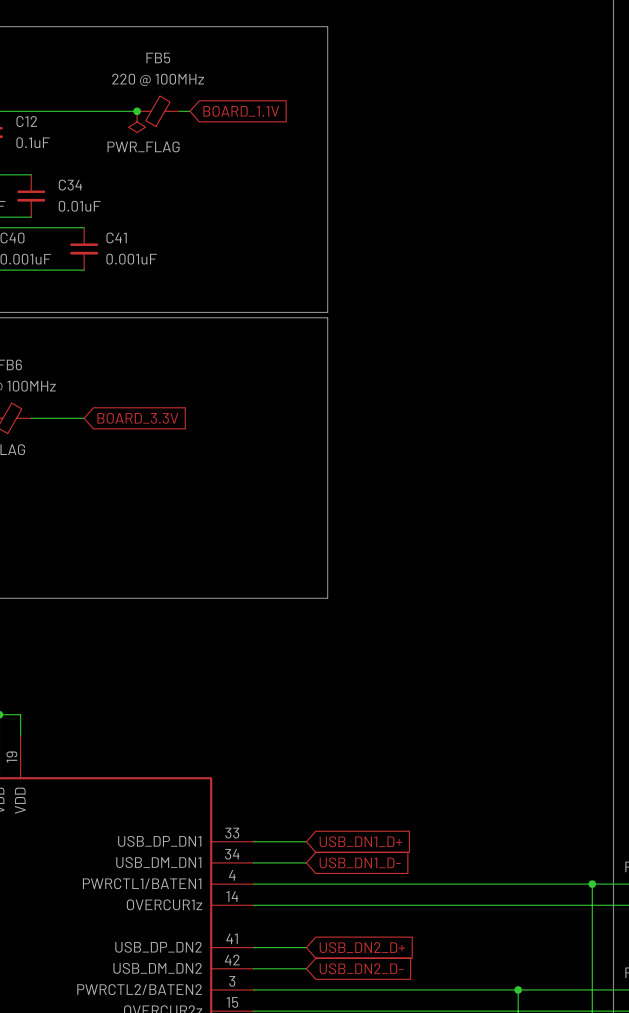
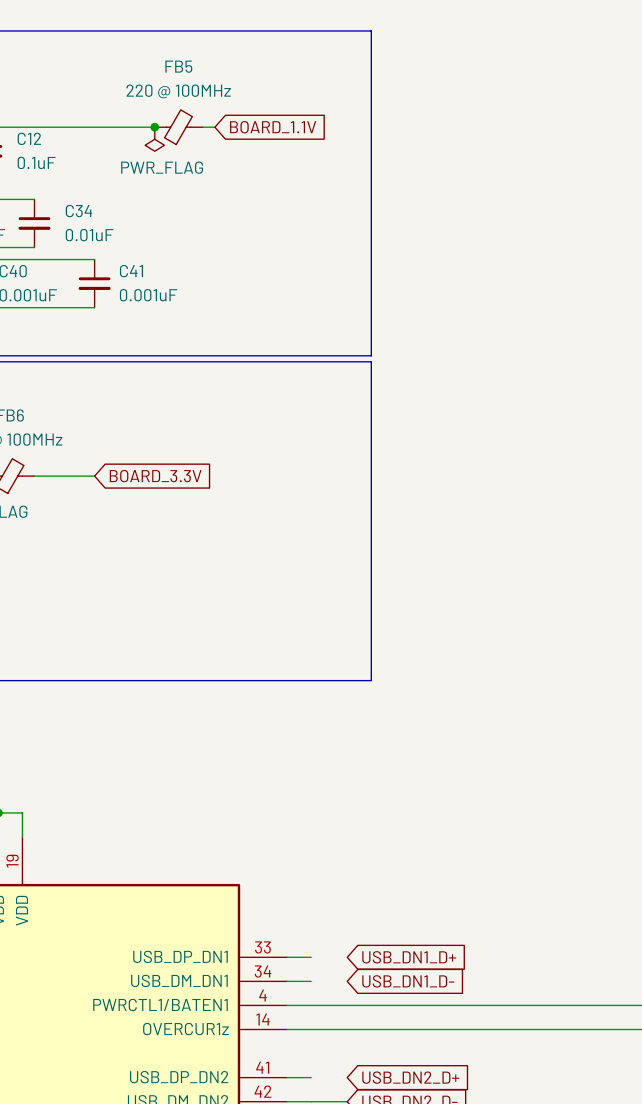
wire: (274, 841) (306, 841) -> none
wire: (274, 862) (306, 862) -> none
wire: (274, 947) (306, 947) -> none

